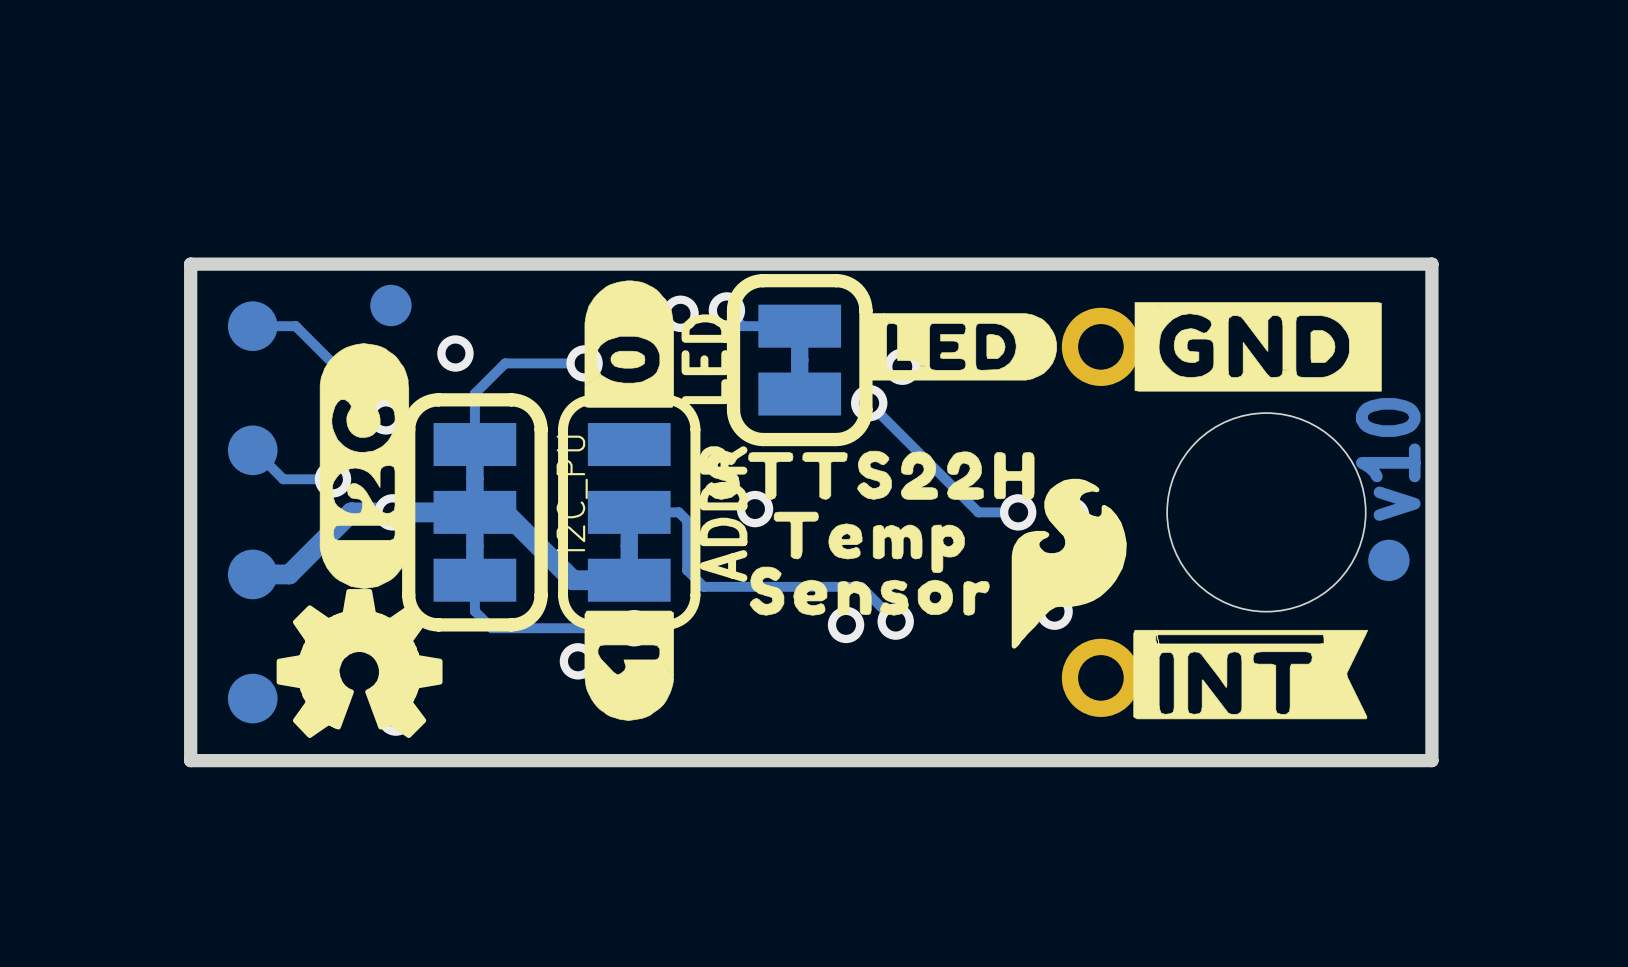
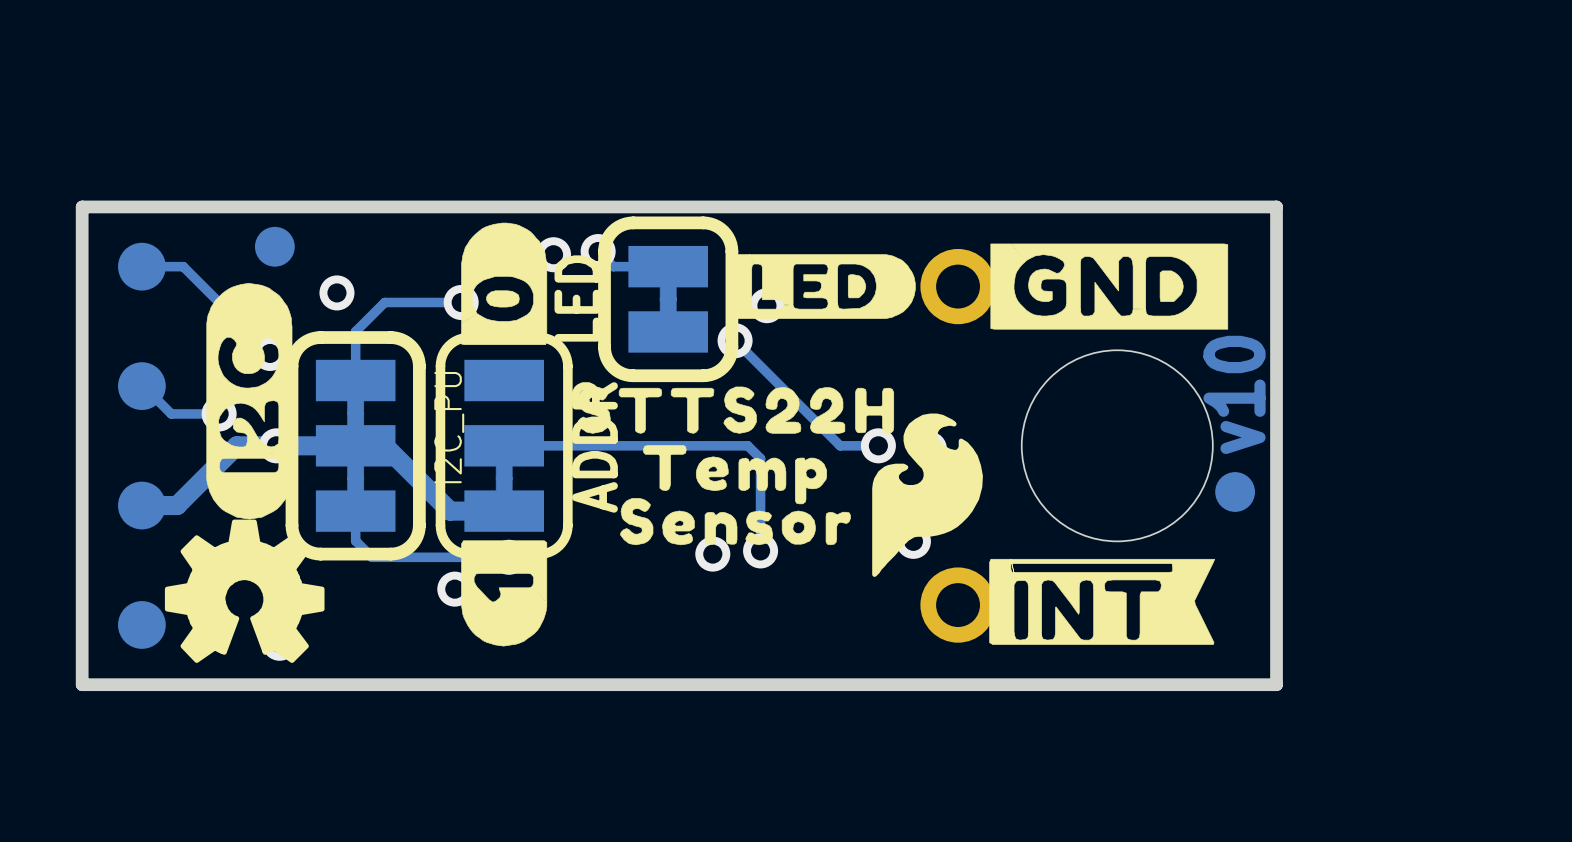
via: (755, 509) -> none
track: (678, 512) (687, 520) (687, 570) (703, 586) (860, 586) (895, 621) -> (551, 445) (747, 445) (760, 458) (760, 550)

